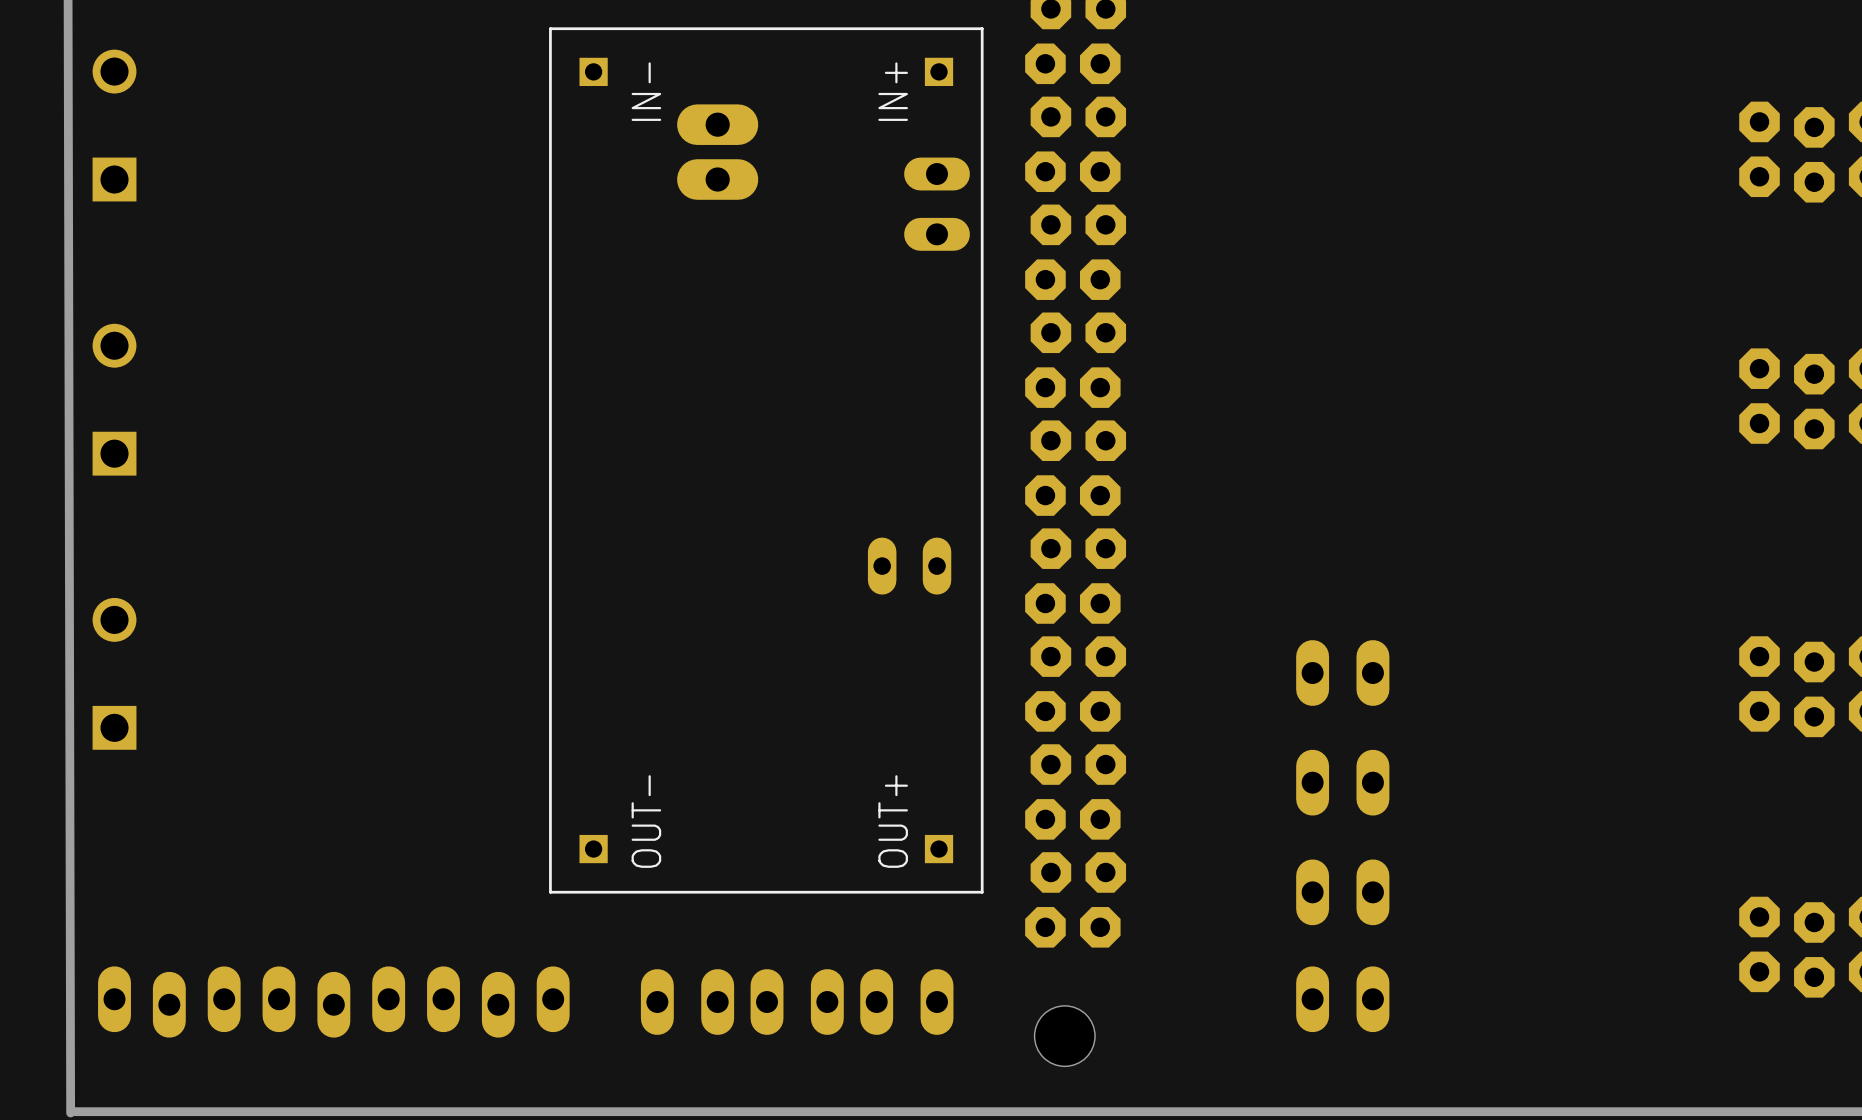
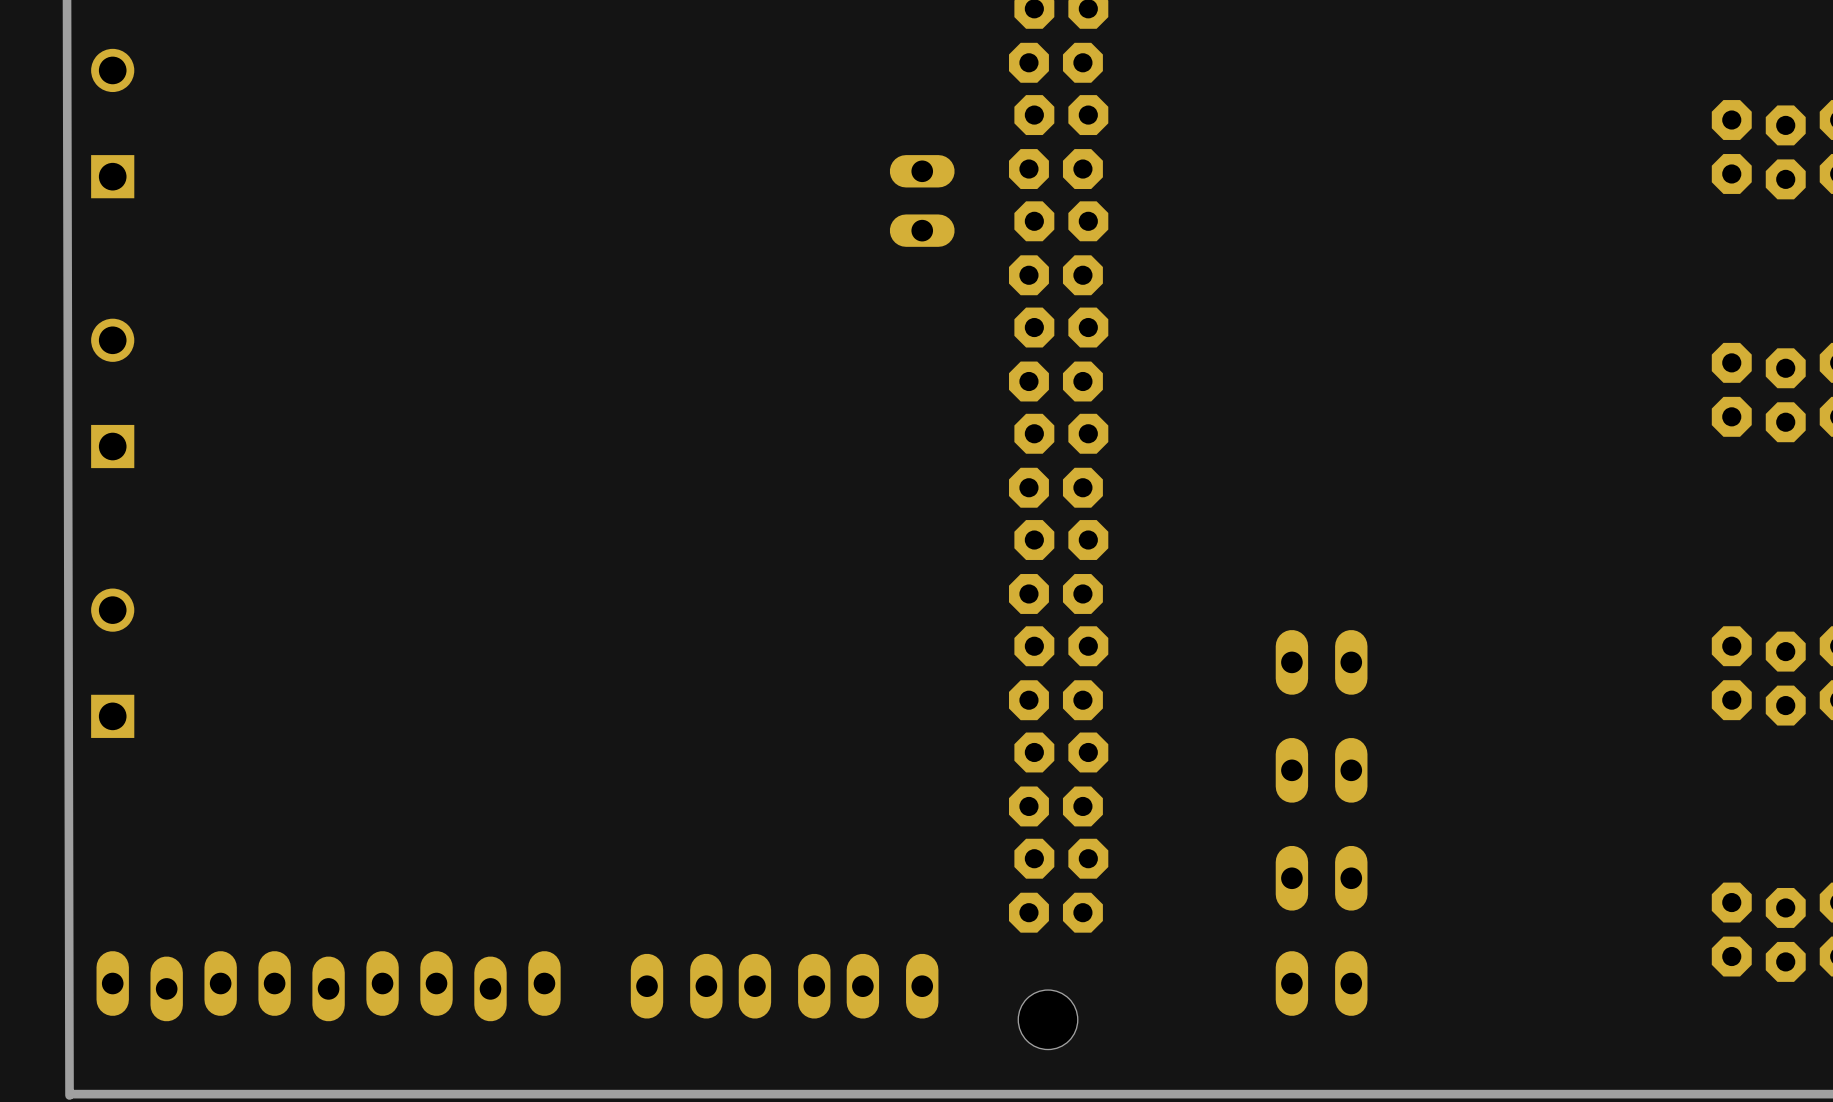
part: (717, 152) -> none
part: (766, 460) -> none
part: (909, 566) -> none

